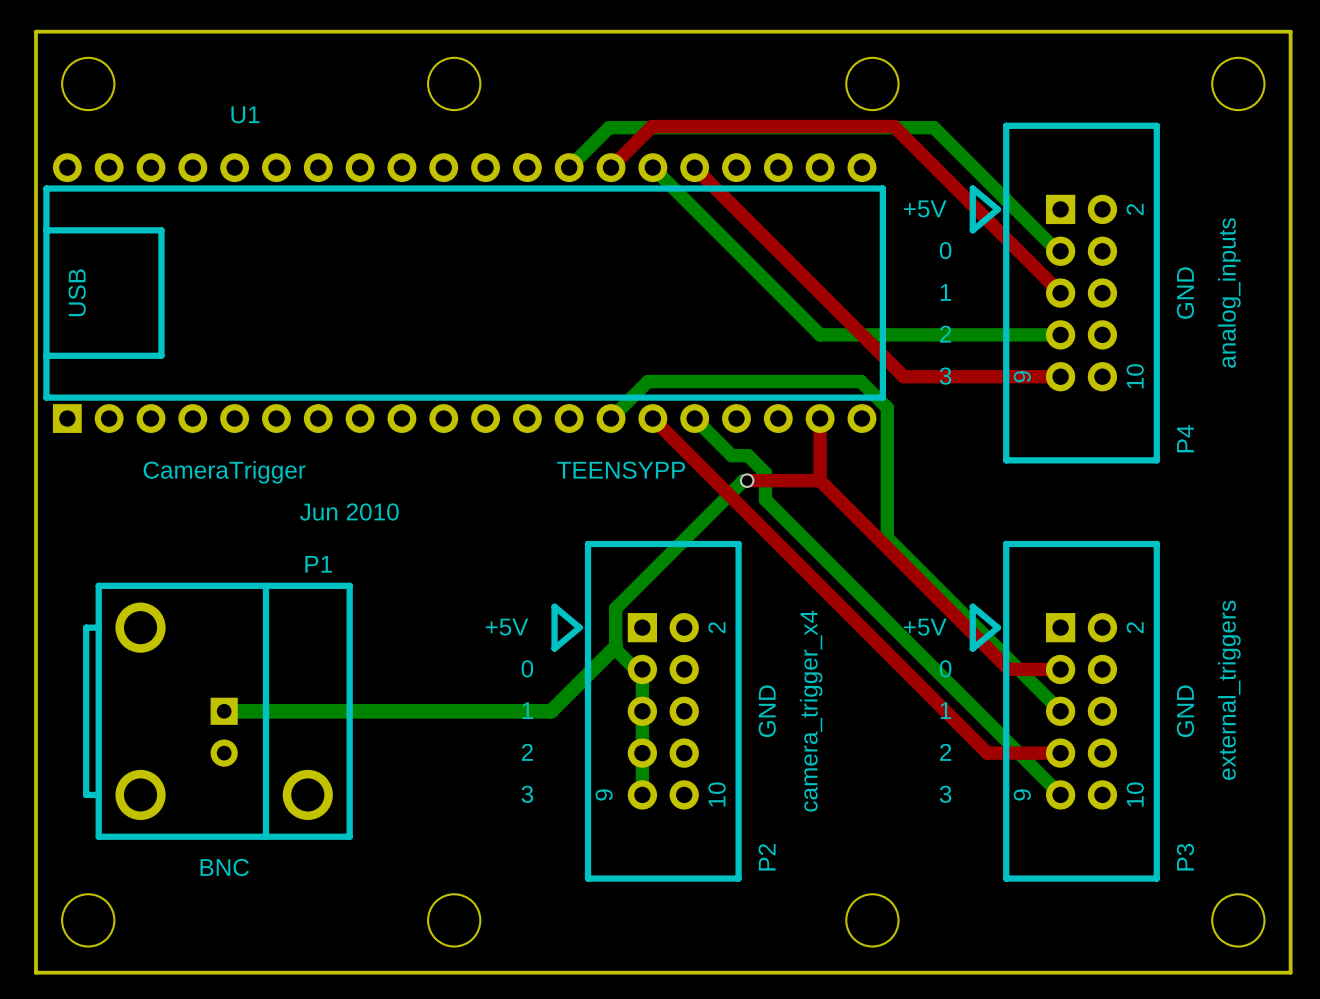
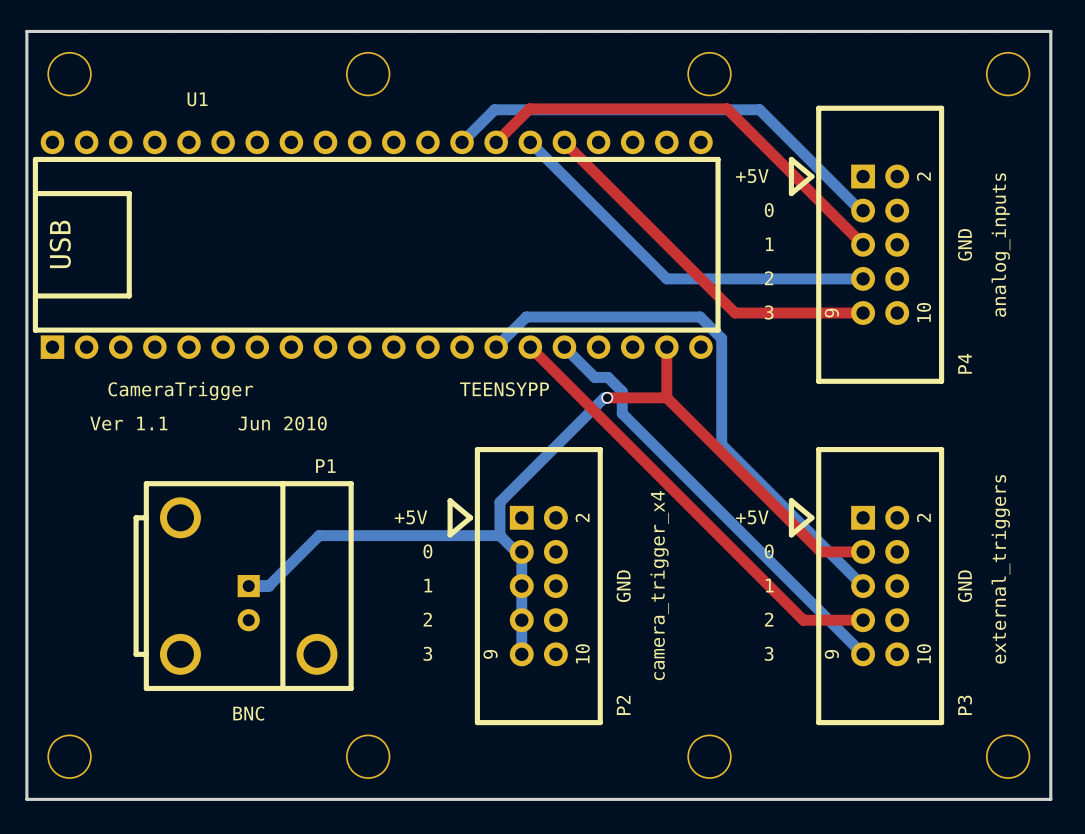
U1 footprint: [43, 153, 887, 433] -> [32, 130, 721, 359]
text: none -> Ver 1.1 (128, 423)
bottom track: (615, 646) (551, 711) (332, 711) -> (499, 535) (319, 535) (268, 586)
P1 position: (217, 711) -> (243, 586)
bottom track: (224, 711) (307, 711) -> none

